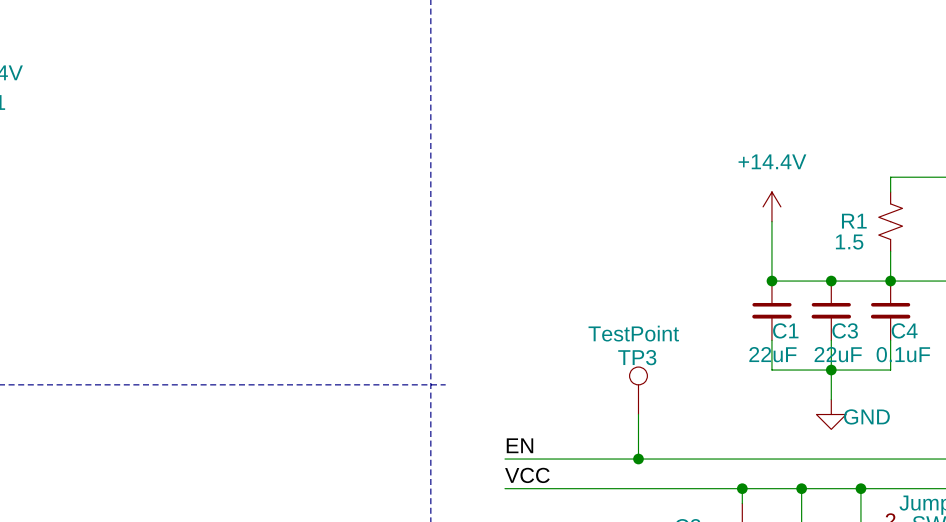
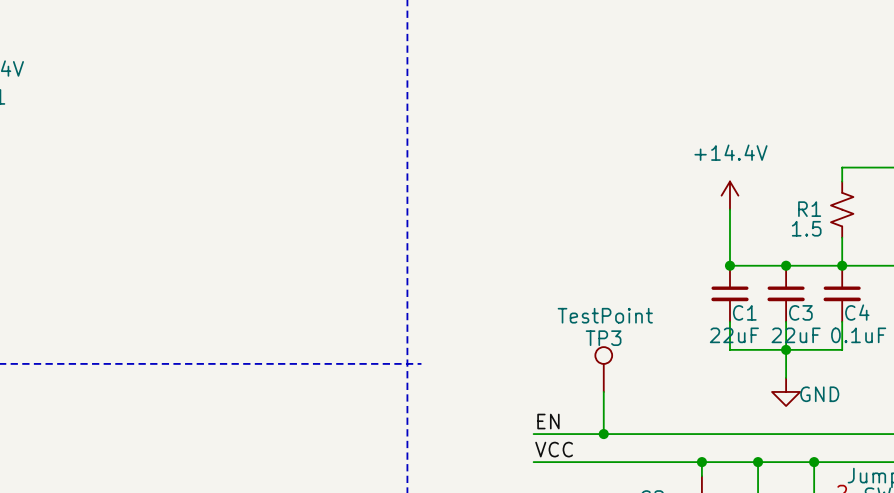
label position: EN (519, 445) -> EN (548, 421)
wire: (505, 459) (564, 459) -> none
label position: VCC (527, 475) -> VCC (554, 449)
wire: (505, 488) (564, 488) -> none

